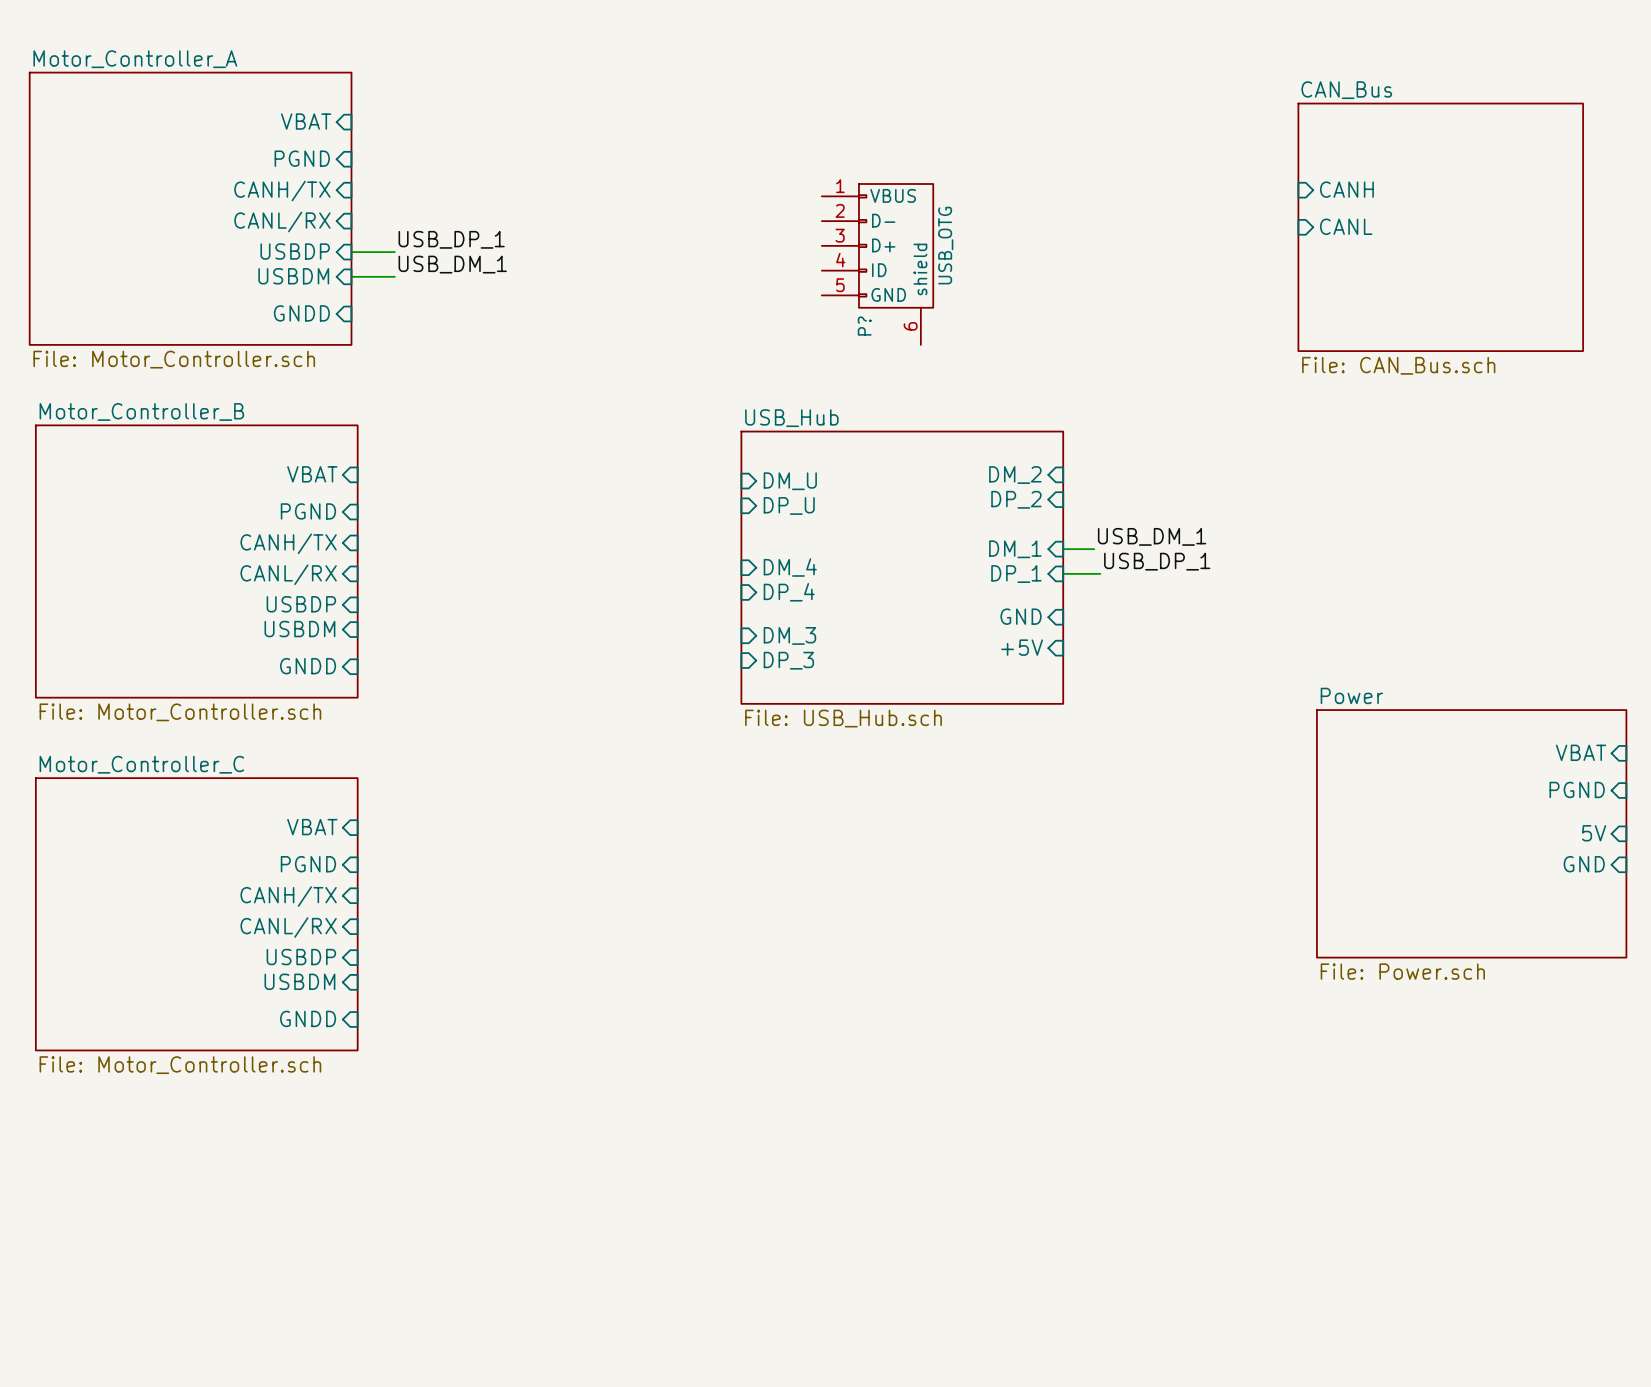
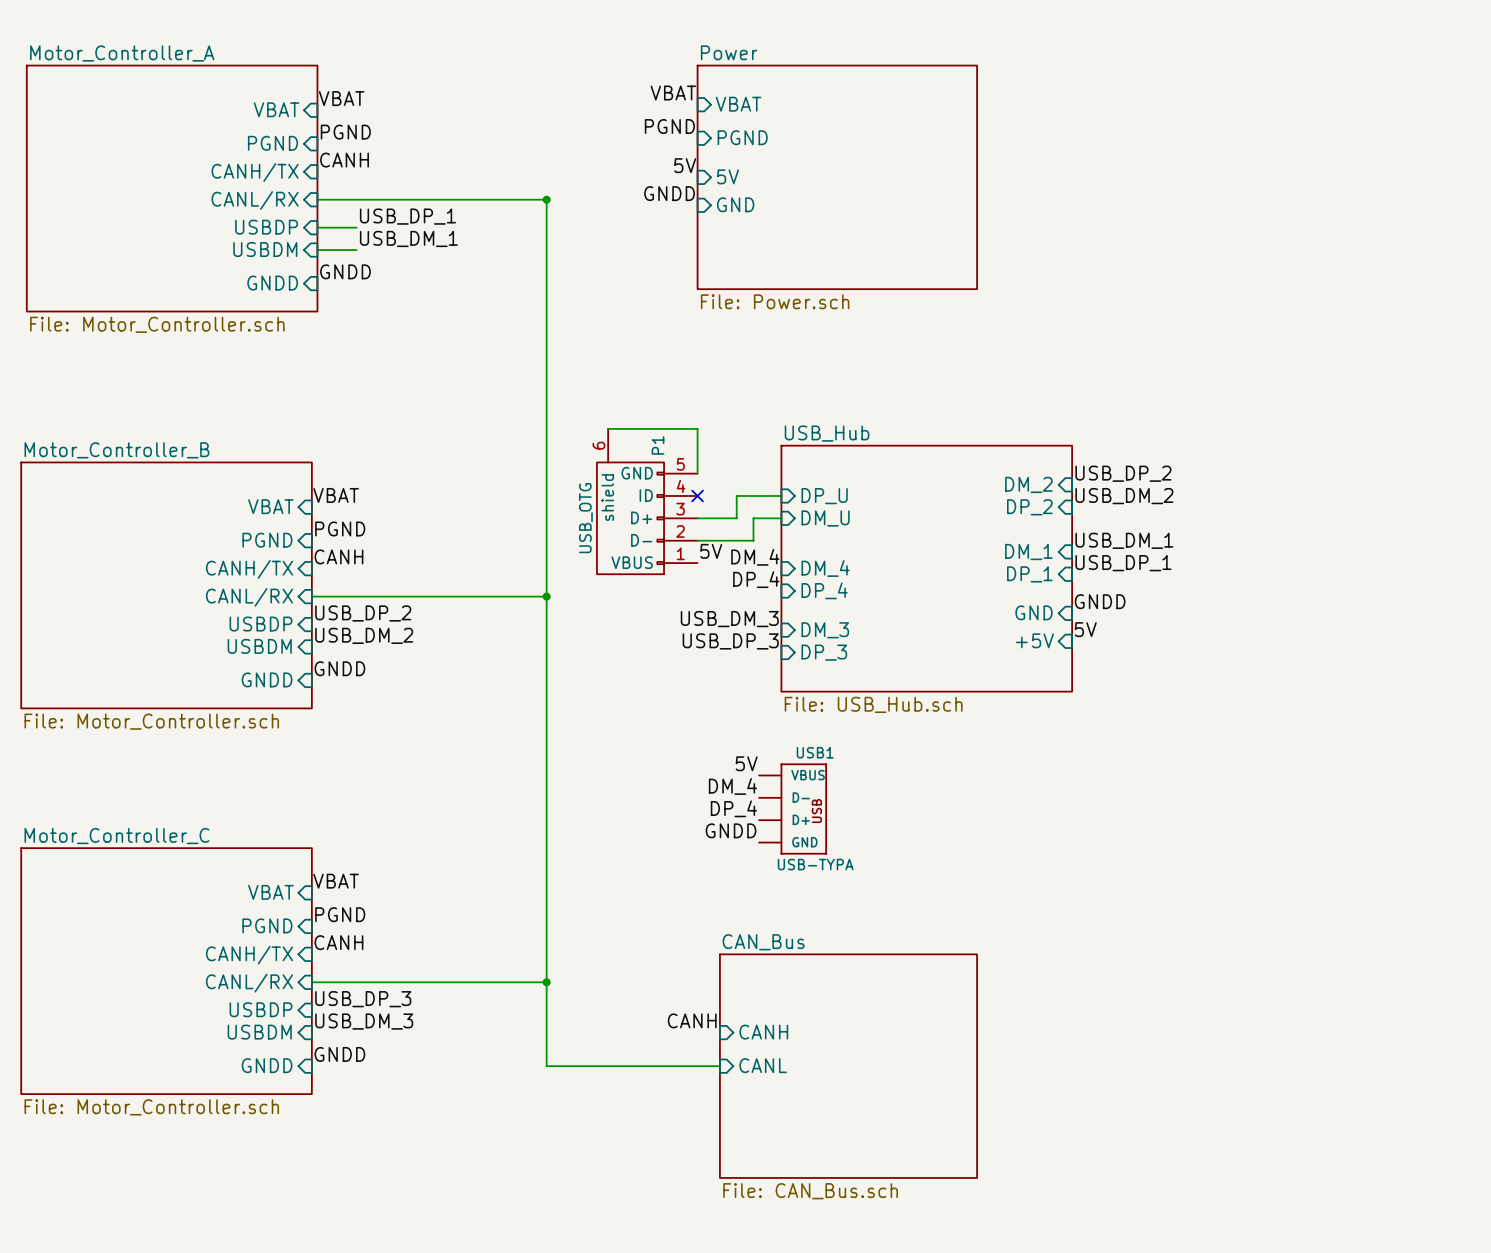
label: none -> VBAT (673, 92)
label: none -> VBAT (341, 98)
sheet pin: none -> VBAT (738, 104)
label: none -> PGND (669, 126)
label: none -> PGND (345, 132)
sheet pin: none -> PGND (742, 137)
label: none -> CANH (344, 160)
label: none -> 5V (685, 165)
sheet pin: CANH (1346, 189) -> none
sheet pin: none -> 5V (728, 176)
sheet Power: none -> File: Power.sch (837, 177)
label: none -> GNDD (669, 193)
wire: none -> (317, 199) (546, 199) (546, 1066) (719, 1066)
junction: none -> (546, 199)
sheet pin: none -> GND (735, 204)
sheet pin: CANL (1346, 226) -> none
sheet CAN_Bus: File: CAN_Bus.sch (1440, 227) -> none
P?: USB_OTG (877, 264) -> none
label: none -> GNDD (345, 271)
sheet pin position: VBAT (312, 474) -> VBAT (270, 506)
wire: none -> (608, 428) (697, 428) (697, 473)
sheet pin position: DM_2 (1015, 475) -> DM_2 (1028, 484)
sheet pin position: DM_U (790, 481) -> DM_U (825, 518)
sheet pin position: DP_2 (1016, 499) -> DP_2 (1029, 507)
sheet pin position: DP_U (789, 505) -> DP_U (824, 496)
sheet pin position: PGND (308, 511) -> PGND (267, 540)
label: none -> USB_DP_2 (1123, 473)
label position: USB_DM_1 (1152, 536) -> USB_DM_1 (1124, 540)
sheet pin position: CANH/TX (288, 543) -> CANH/TX (249, 569)
label: none -> VBAT (336, 495)
no-connect mark: none -> (697, 495)
wire: none -> (781, 495) (736, 495) (736, 518) (697, 518)
sheet pin position: DM_1 (1015, 549) -> DM_1 (1028, 552)
wire: (1063, 549) (1094, 549) -> none
label: none -> USB_DM_2 (1124, 496)
P1: none -> USB_OTG (647, 501)
sheet Motor_Controller_B position: (196, 561) -> (166, 585)
label position: USB_DP_1 (1157, 561) -> USB_DP_1 (1123, 563)
sheet pin position: DM_4 (790, 567) -> DM_4 (825, 568)
sheet USB_Hub position: (902, 567) -> (926, 568)
wire: none -> (781, 518) (753, 518) (753, 540) (697, 540)
wire: (1063, 573) (1100, 573) -> none
sheet pin position: CANL/RX (288, 574) -> CANL/RX (249, 597)
sheet pin position: DP_1 (1016, 574) -> DP_1 (1029, 574)
label: none -> PGND (340, 529)
sheet pin position: DP_4 (789, 592) -> DP_4 (824, 590)
sheet pin position: USBDP (301, 604) -> USBDP (261, 624)
label: none -> 5V (711, 551)
label: none -> CANH (338, 556)
label: none -> DM_4 (755, 557)
sheet pin position: GND (1021, 616) -> GND (1034, 612)
sheet pin position: USBDM (299, 629) -> USBDM (259, 646)
sheet pin position: DM_3 (789, 635) -> DM_3 (825, 630)
label: none -> DP_4 (756, 579)
sheet pin position: +5V (1022, 647) -> +5V (1034, 640)
wire: none -> (311, 596) (546, 596)
junction: none -> (546, 596)
sheet pin position: DP_3 (788, 660) -> DP_3 (824, 652)
sheet pin position: GNDD (308, 666) -> GNDD (267, 679)
label: none -> GNDD (1100, 601)
label: none -> USB_DP_2 (363, 613)
label: none -> USB_DM_3 (729, 619)
label: none -> 5V (1085, 629)
label: none -> USB_DM_2 (364, 635)
label: none -> USB_DP_3 (730, 641)
label: none -> GNDD (339, 668)
sheet pin: VBAT (1581, 752) -> none
sheet pin: PGND (1577, 789) -> none
sheet pin: VBAT (312, 827) -> none
sheet Power: File: Power.sch (1471, 833) -> none
sheet pin: 5V (1594, 833) -> none
label: none -> 5V (746, 763)
sheet pin: PGND (308, 864) -> none
sheet pin: GND (1584, 864) -> none
label: none -> DM_4 (732, 786)
label: none -> DP_4 (733, 808)
USB1: none -> USB-TYPA (792, 809)
sheet pin: CANH/TX (288, 896) -> none
sheet Motor_Controller_C position: (196, 914) -> (166, 971)
label: none -> GNDD (731, 830)
sheet pin: CANL/RX (288, 927) -> none
sheet pin: USBDP (301, 957) -> none
label: none -> VBAT (336, 881)
sheet pin: USBDM (299, 981) -> none
sheet pin: none -> VBAT (270, 892)
label: none -> PGND (340, 914)
sheet pin: GNDD (308, 1018) -> PGND (267, 925)
label: none -> CANH (338, 942)
sheet pin: none -> CANH/TX (249, 955)
wire: none -> (311, 982) (546, 982)
junction: none -> (546, 982)
sheet pin: none -> CANL/RX (249, 983)
label: none -> USB_DP_3 (363, 999)
sheet pin: none -> USBDP (261, 1009)
label: none -> CANH (692, 1020)
label: none -> USB_DM_3 (364, 1021)
sheet pin: none -> USBDM (259, 1032)
sheet pin: none -> CANH (763, 1032)
label: none -> GNDD (339, 1054)
sheet pin: none -> GNDD (267, 1065)
sheet pin: none -> CANL (763, 1065)
sheet CAN_Bus: none -> File: CAN_Bus.sch (848, 1066)

